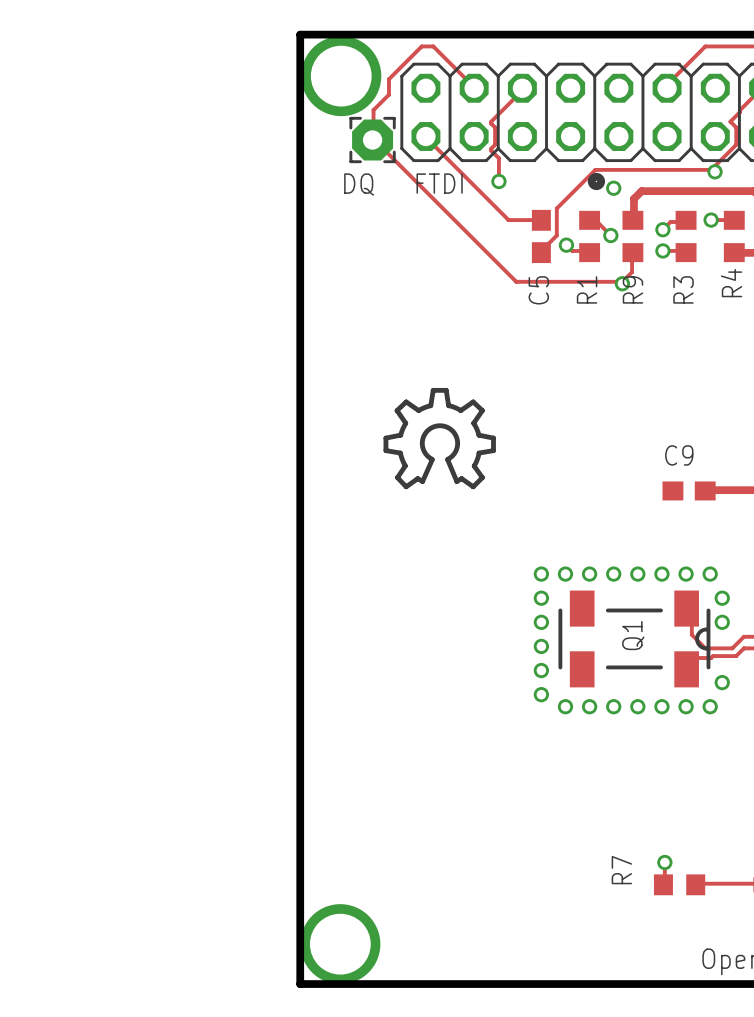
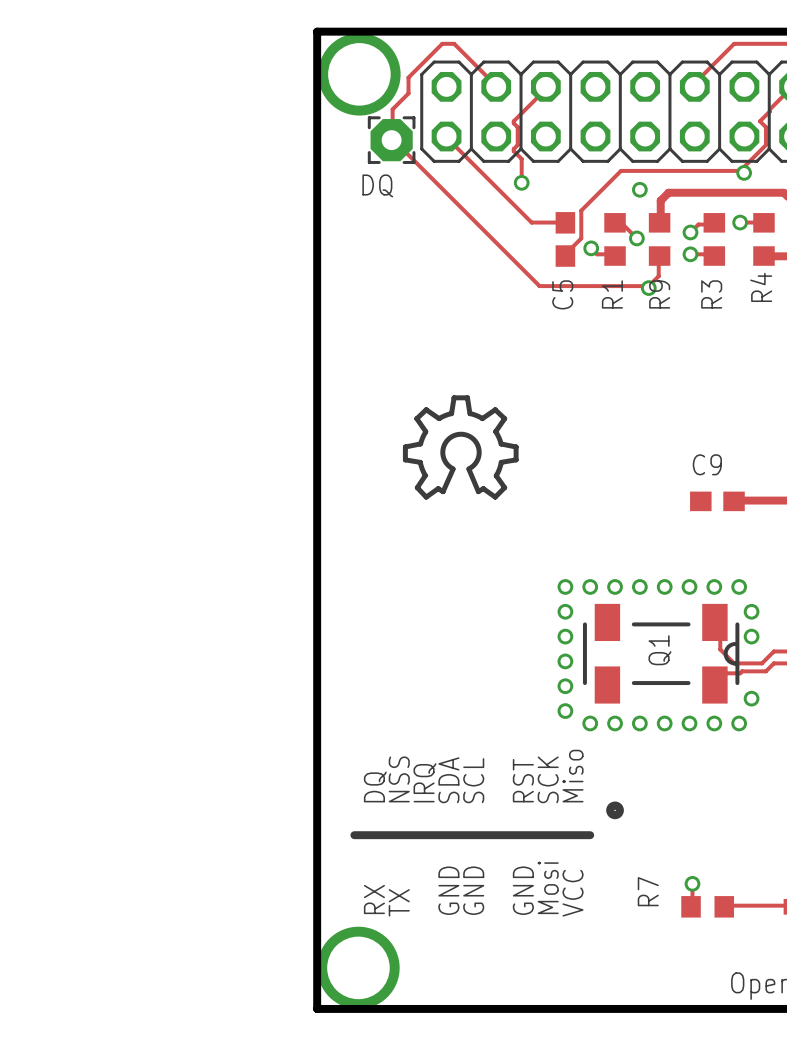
drawing: [587, 172, 606, 191] -> none
text: FTDI (439, 183) -> none
text: none -> Miso (573, 776)
text: none -> NSS (399, 779)
text: none -> SDA (448, 780)
text: none -> SCK (548, 779)
text: none -> SCL (473, 780)
text: none -> RST (523, 780)
text: none -> IRQ (425, 782)
text: none -> DQ (375, 786)
drawing: none -> [606, 801, 624, 820]
line: none -> (354, 835) (590, 835)
text: none -> Mosi (548, 887)
text: none -> GND (448, 890)
text: none -> GND (473, 890)
text: none -> GND (523, 890)
text: none -> VCC (573, 893)
text: none -> RX (374, 899)
text: none -> TX (399, 902)

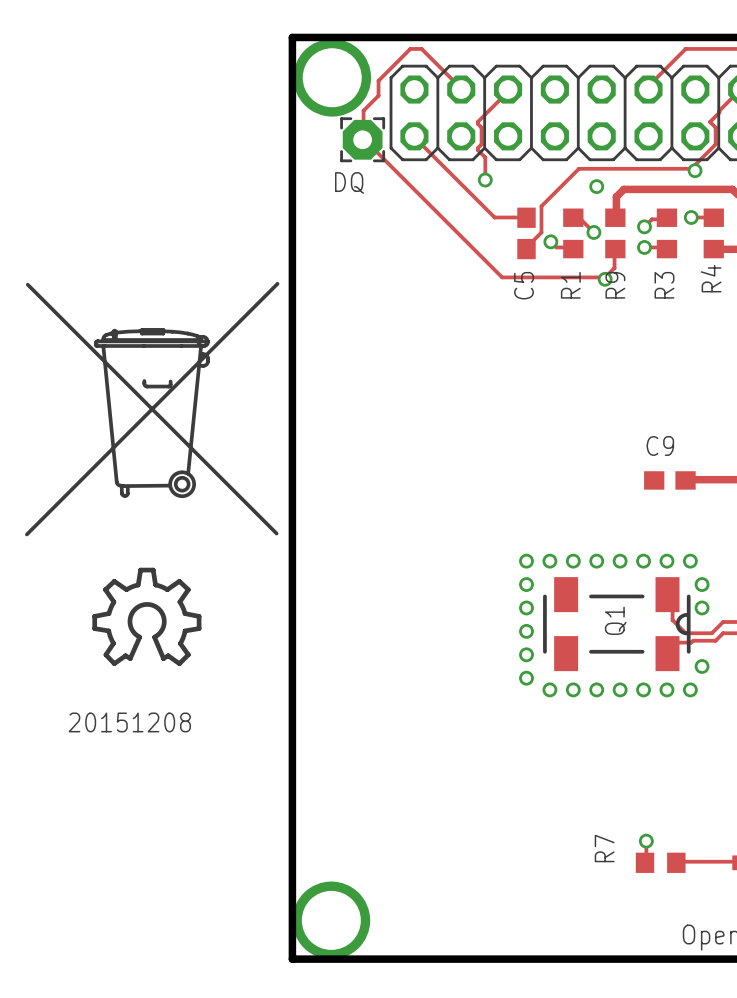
drawing: none -> [25, 281, 280, 537]
drawing position: (460, 447) -> (146, 616)
text: none -> 20151208 (129, 722)
text: Miso (573, 776) -> none
text: NSS (399, 779) -> none
text: SCK (548, 779) -> none
text: SDA (448, 780) -> none
text: SCL (473, 780) -> none
text: RST (523, 780) -> none
text: IRQ (425, 782) -> none
text: DQ (375, 786) -> none
drawing: [606, 801, 624, 820] -> none
line: (354, 835) (590, 835) -> none
text: Mosi (548, 887) -> none
text: GND (448, 890) -> none
text: GND (473, 890) -> none
text: GND (523, 890) -> none
text: VCC (573, 893) -> none
text: RX (374, 899) -> none
text: TX (399, 902) -> none

